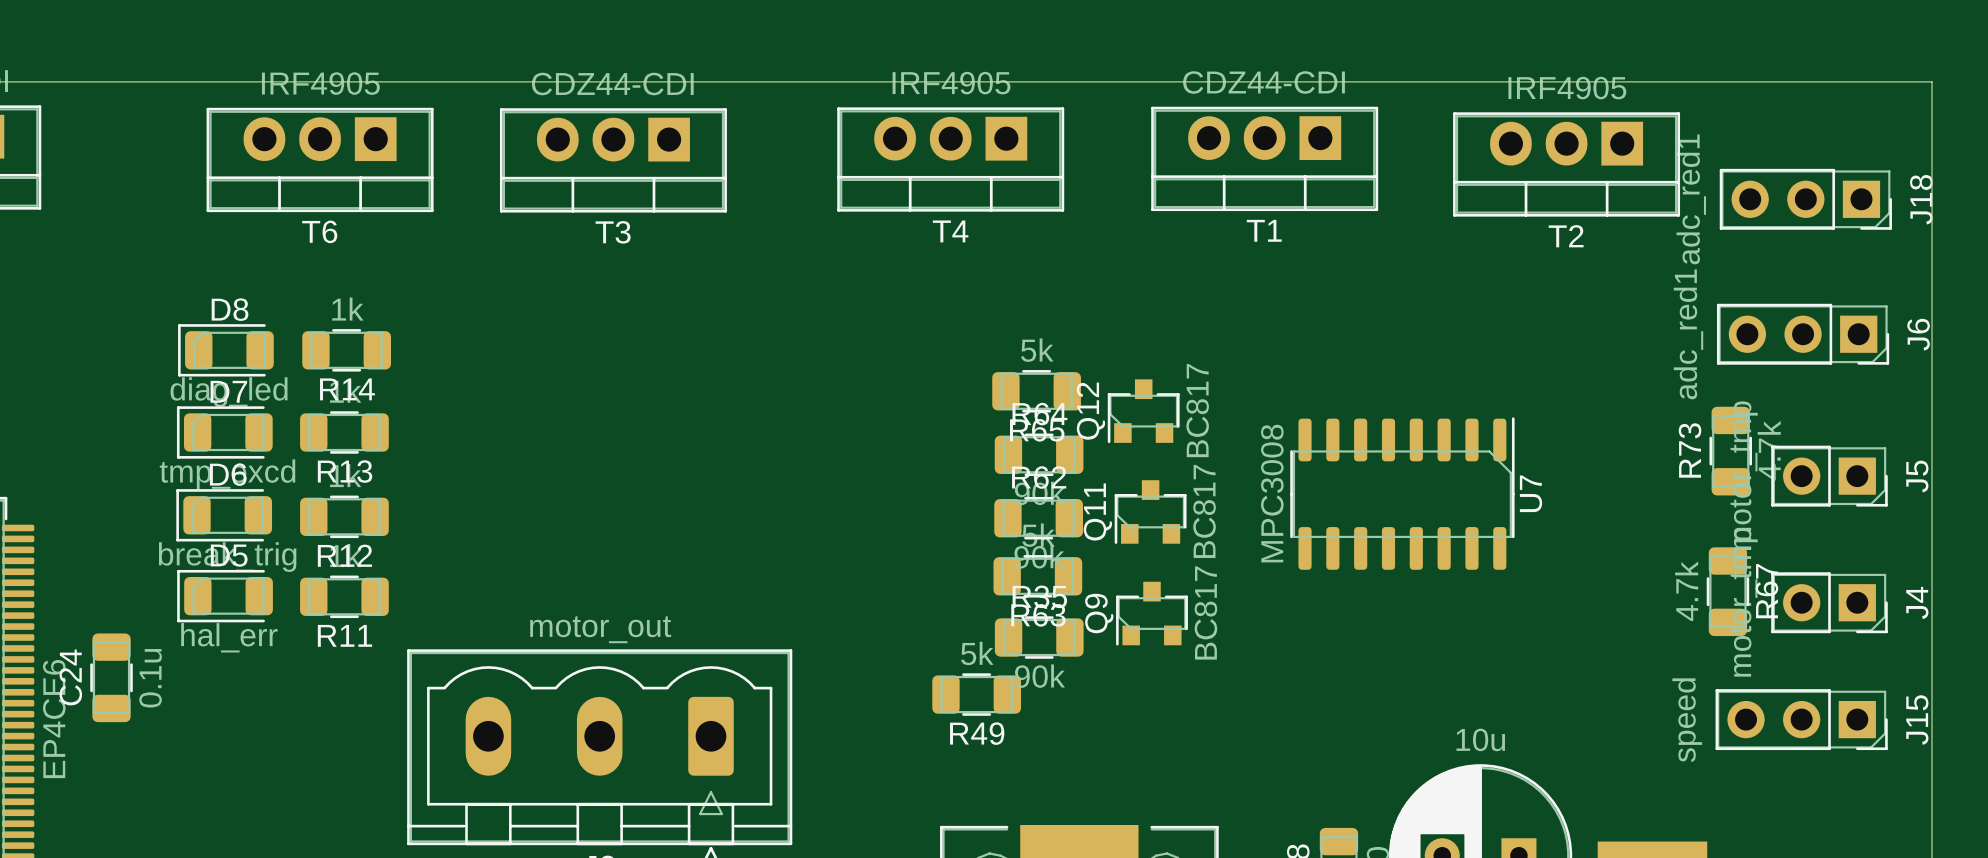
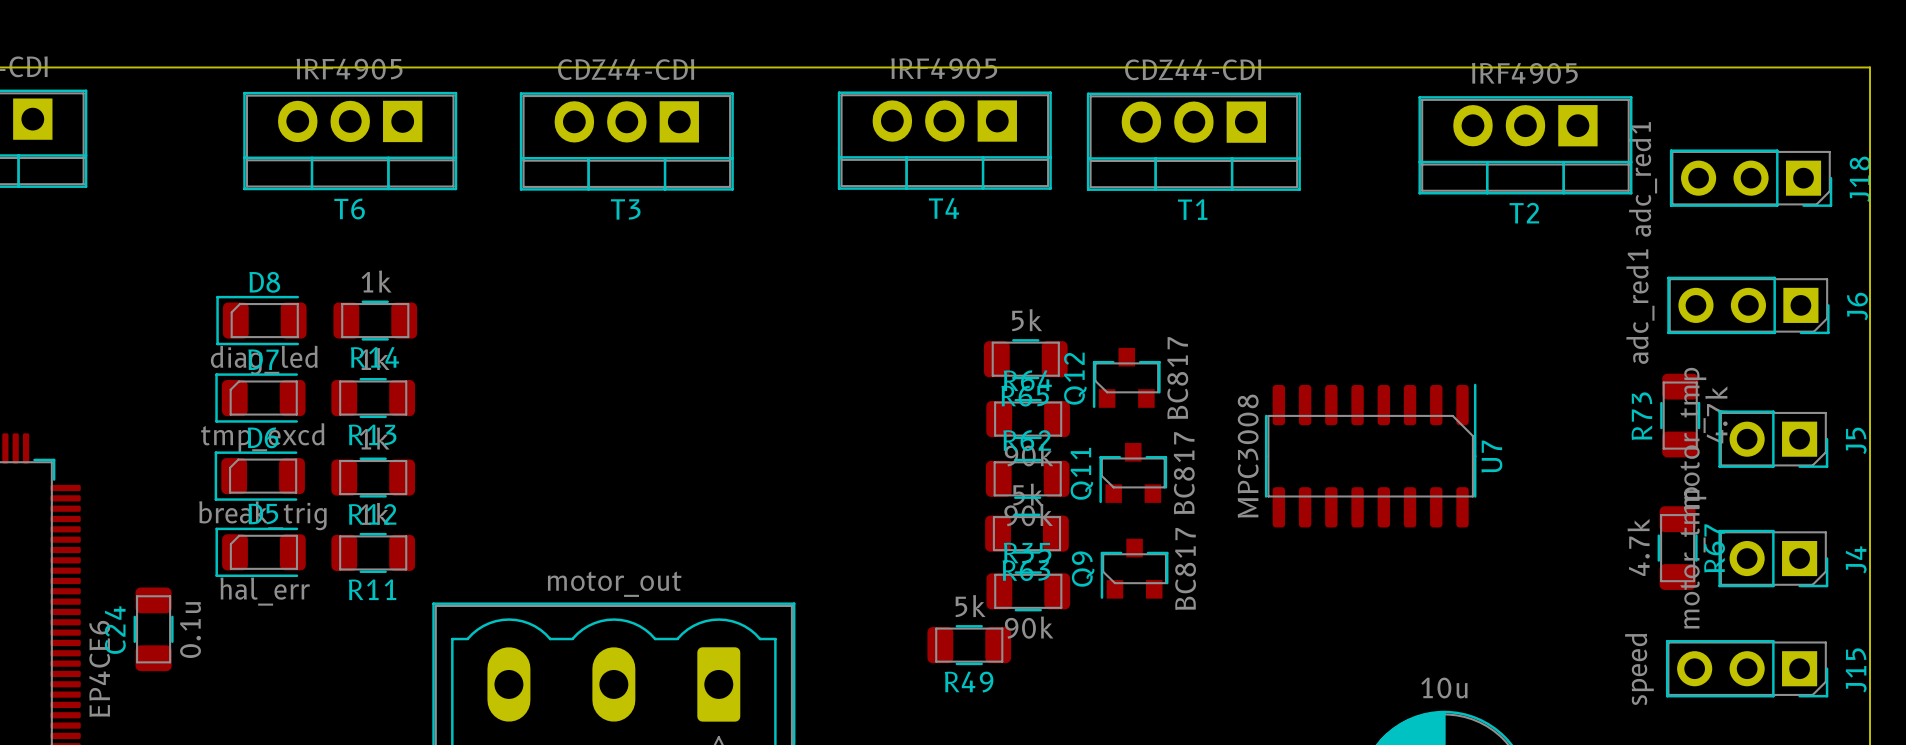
T1 footprint: [1151, 106, 1379, 212] -> [1086, 92, 1301, 191]

